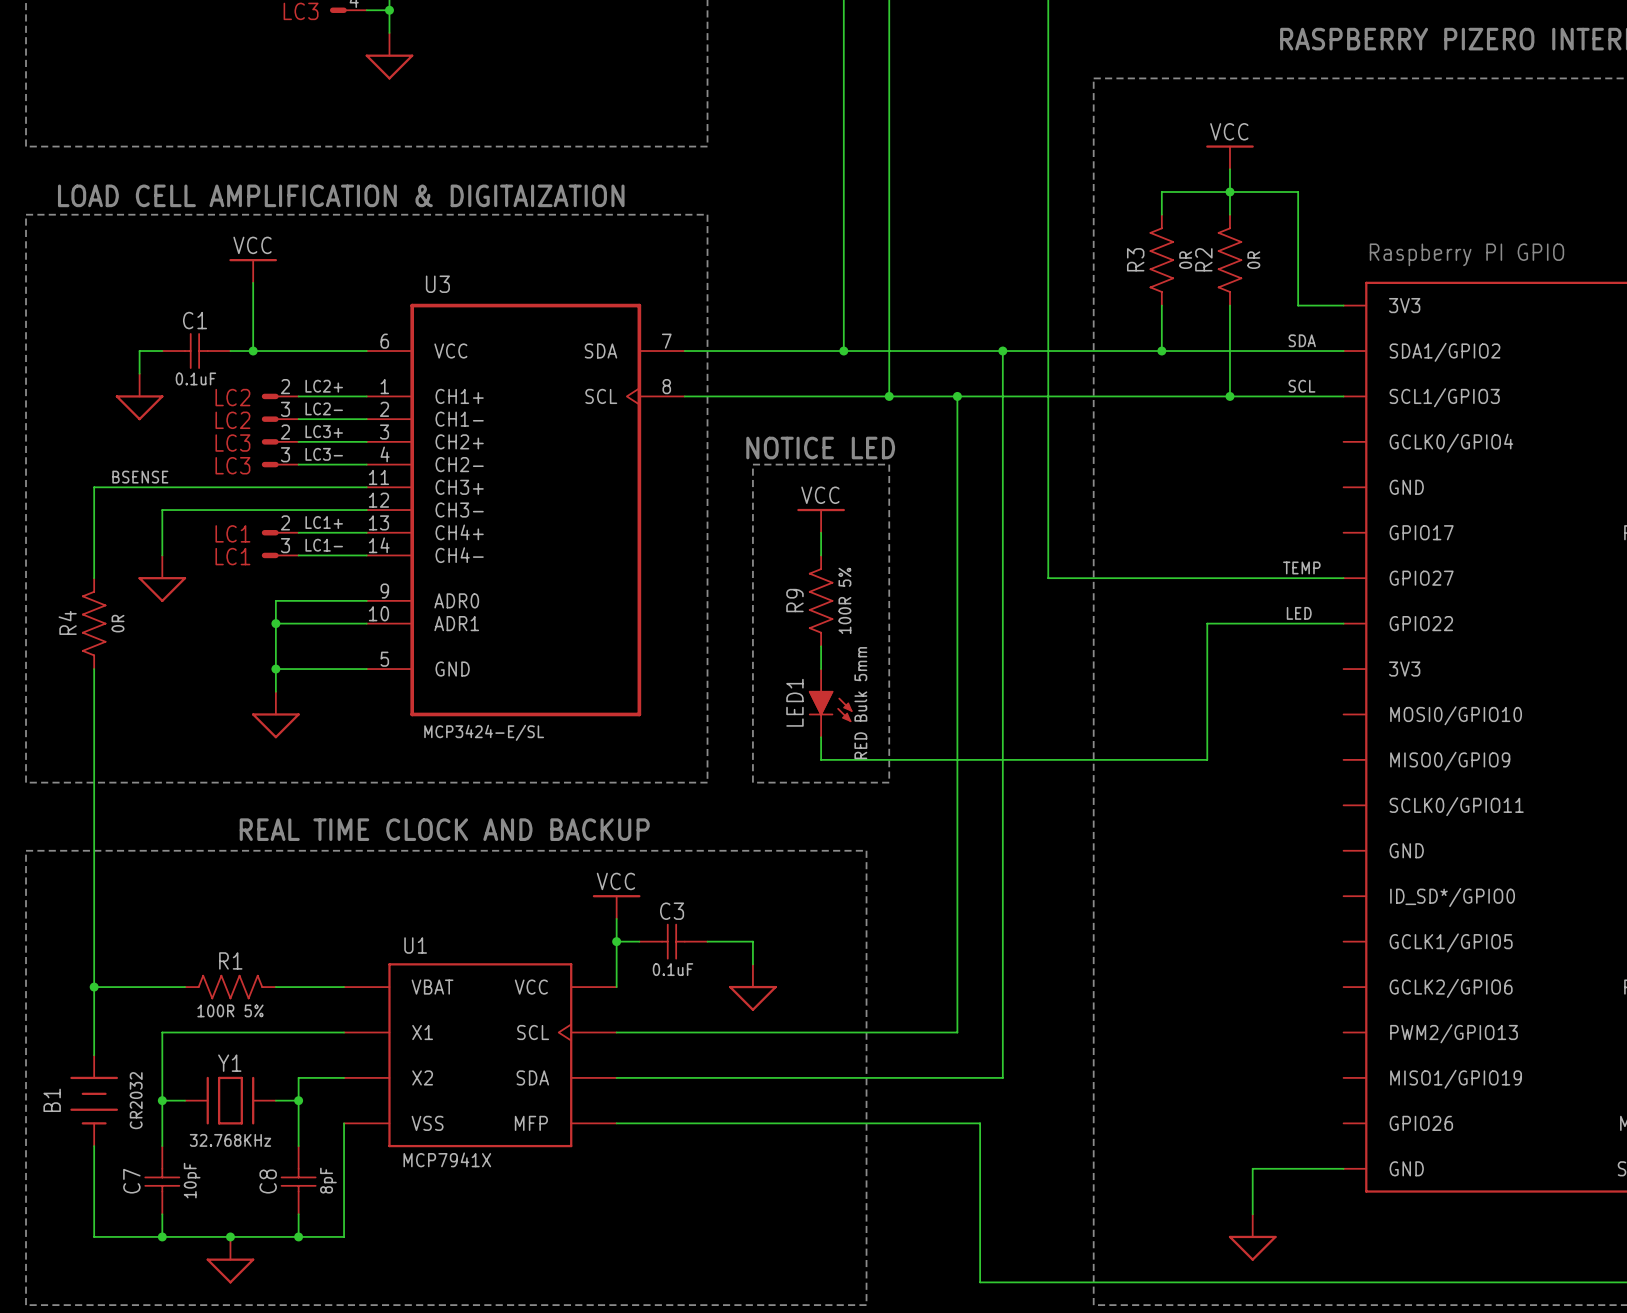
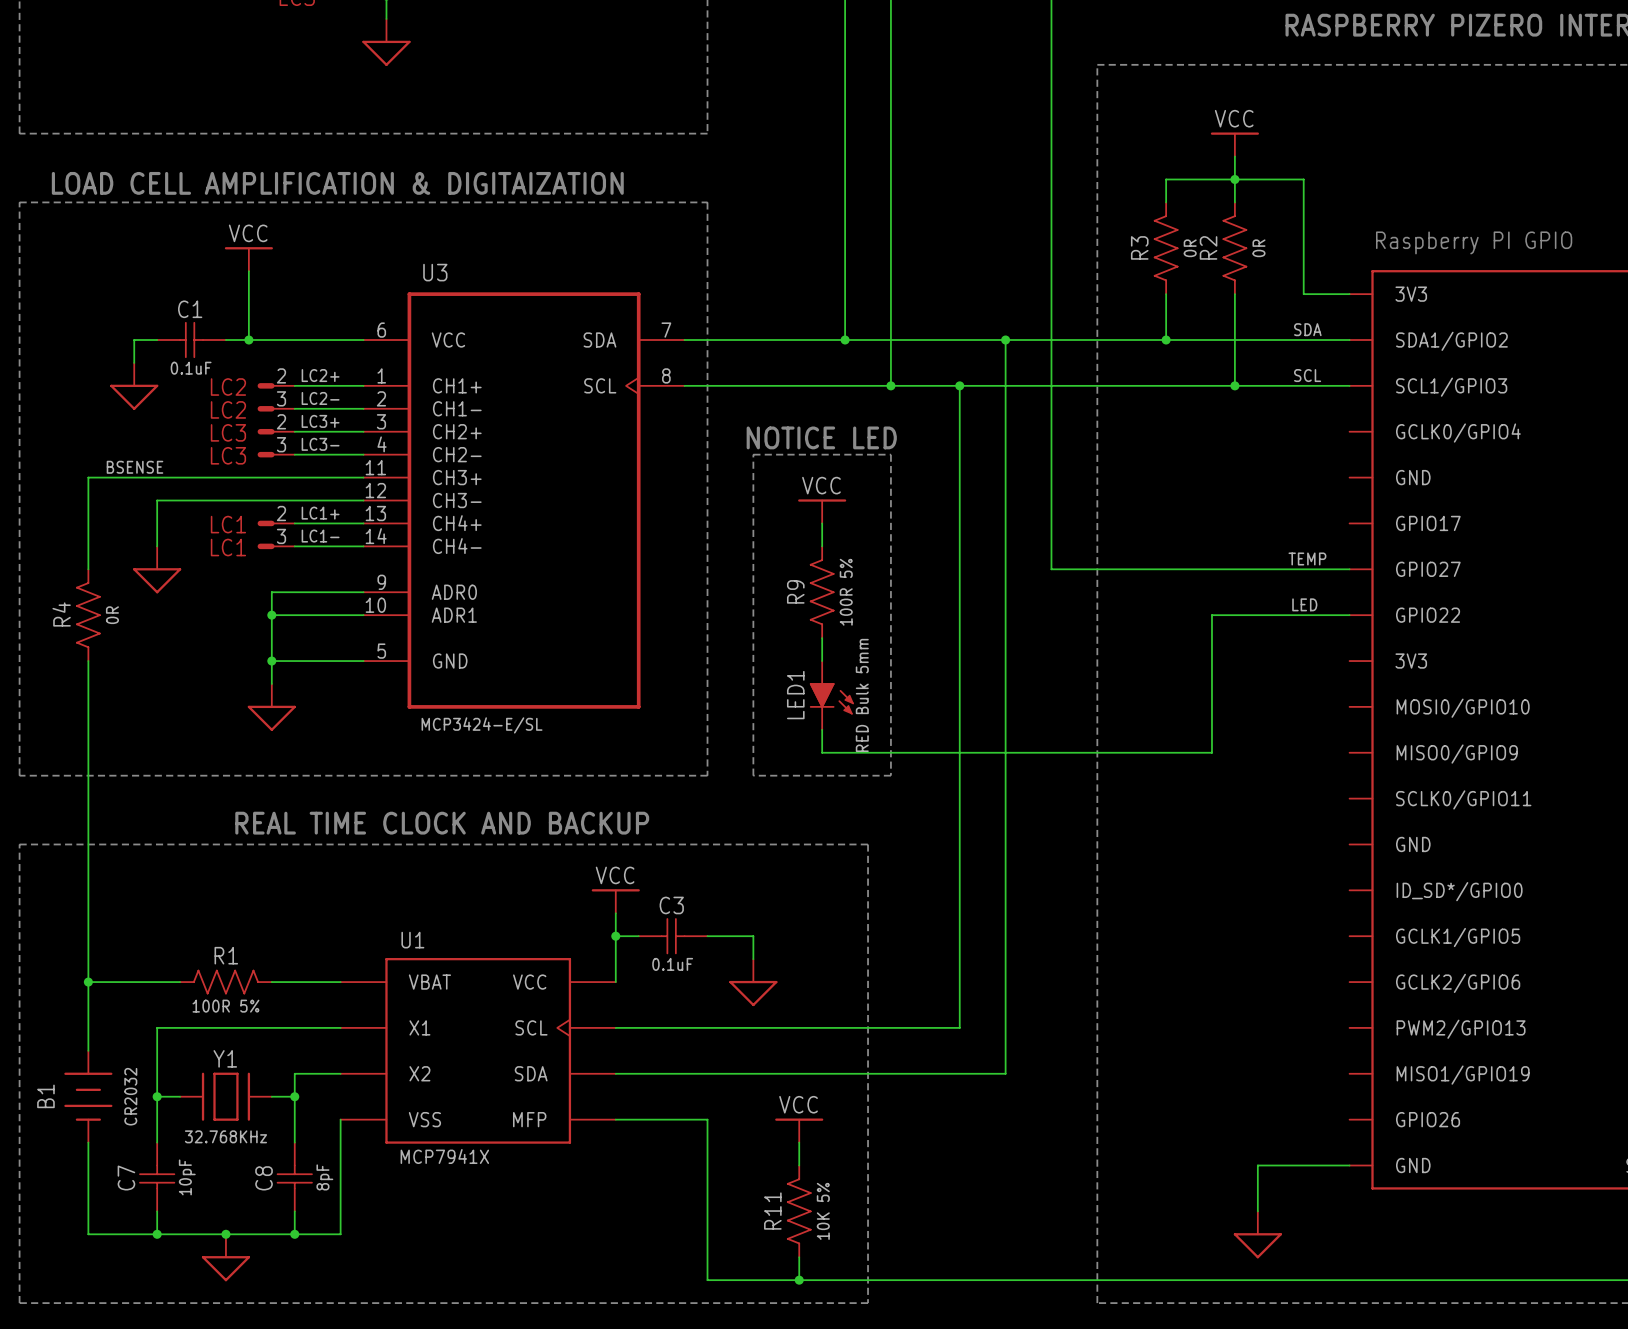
wire: (707, 1123) (980, 1123) (980, 1282) -> (707, 1119) (707, 1280) (982, 1280)
power symbol: none -> VCC (799, 1130)
wire: none -> (799, 1142) (799, 1165)
R11: none -> 10K 5% (799, 1211)
wire: none -> (799, 1257) (799, 1280)
junction: none -> (799, 1280)

